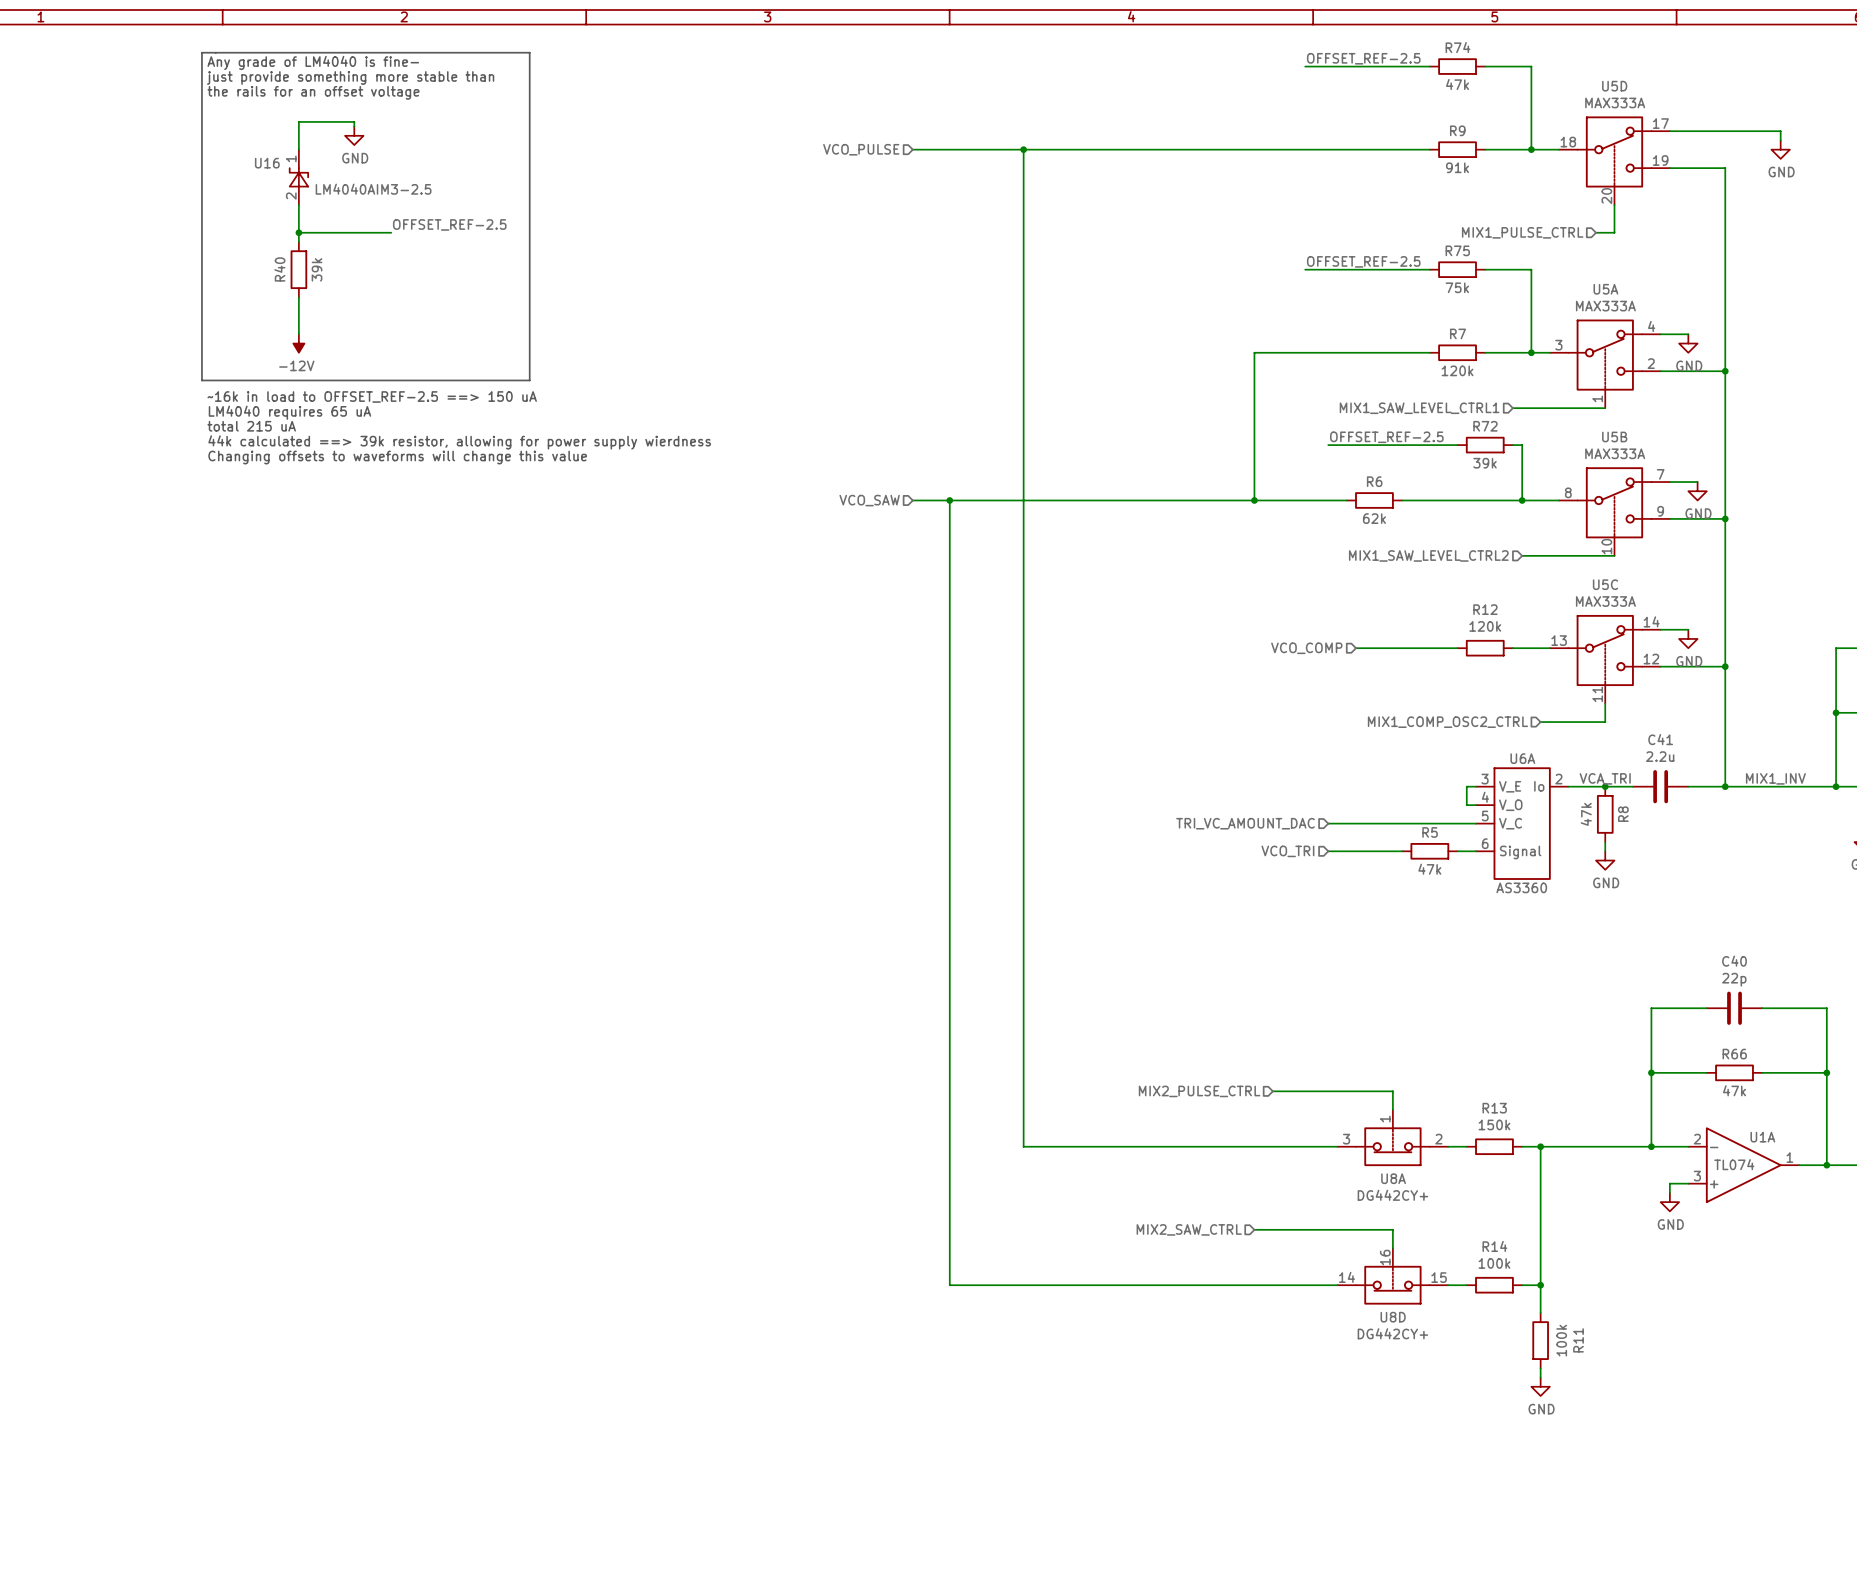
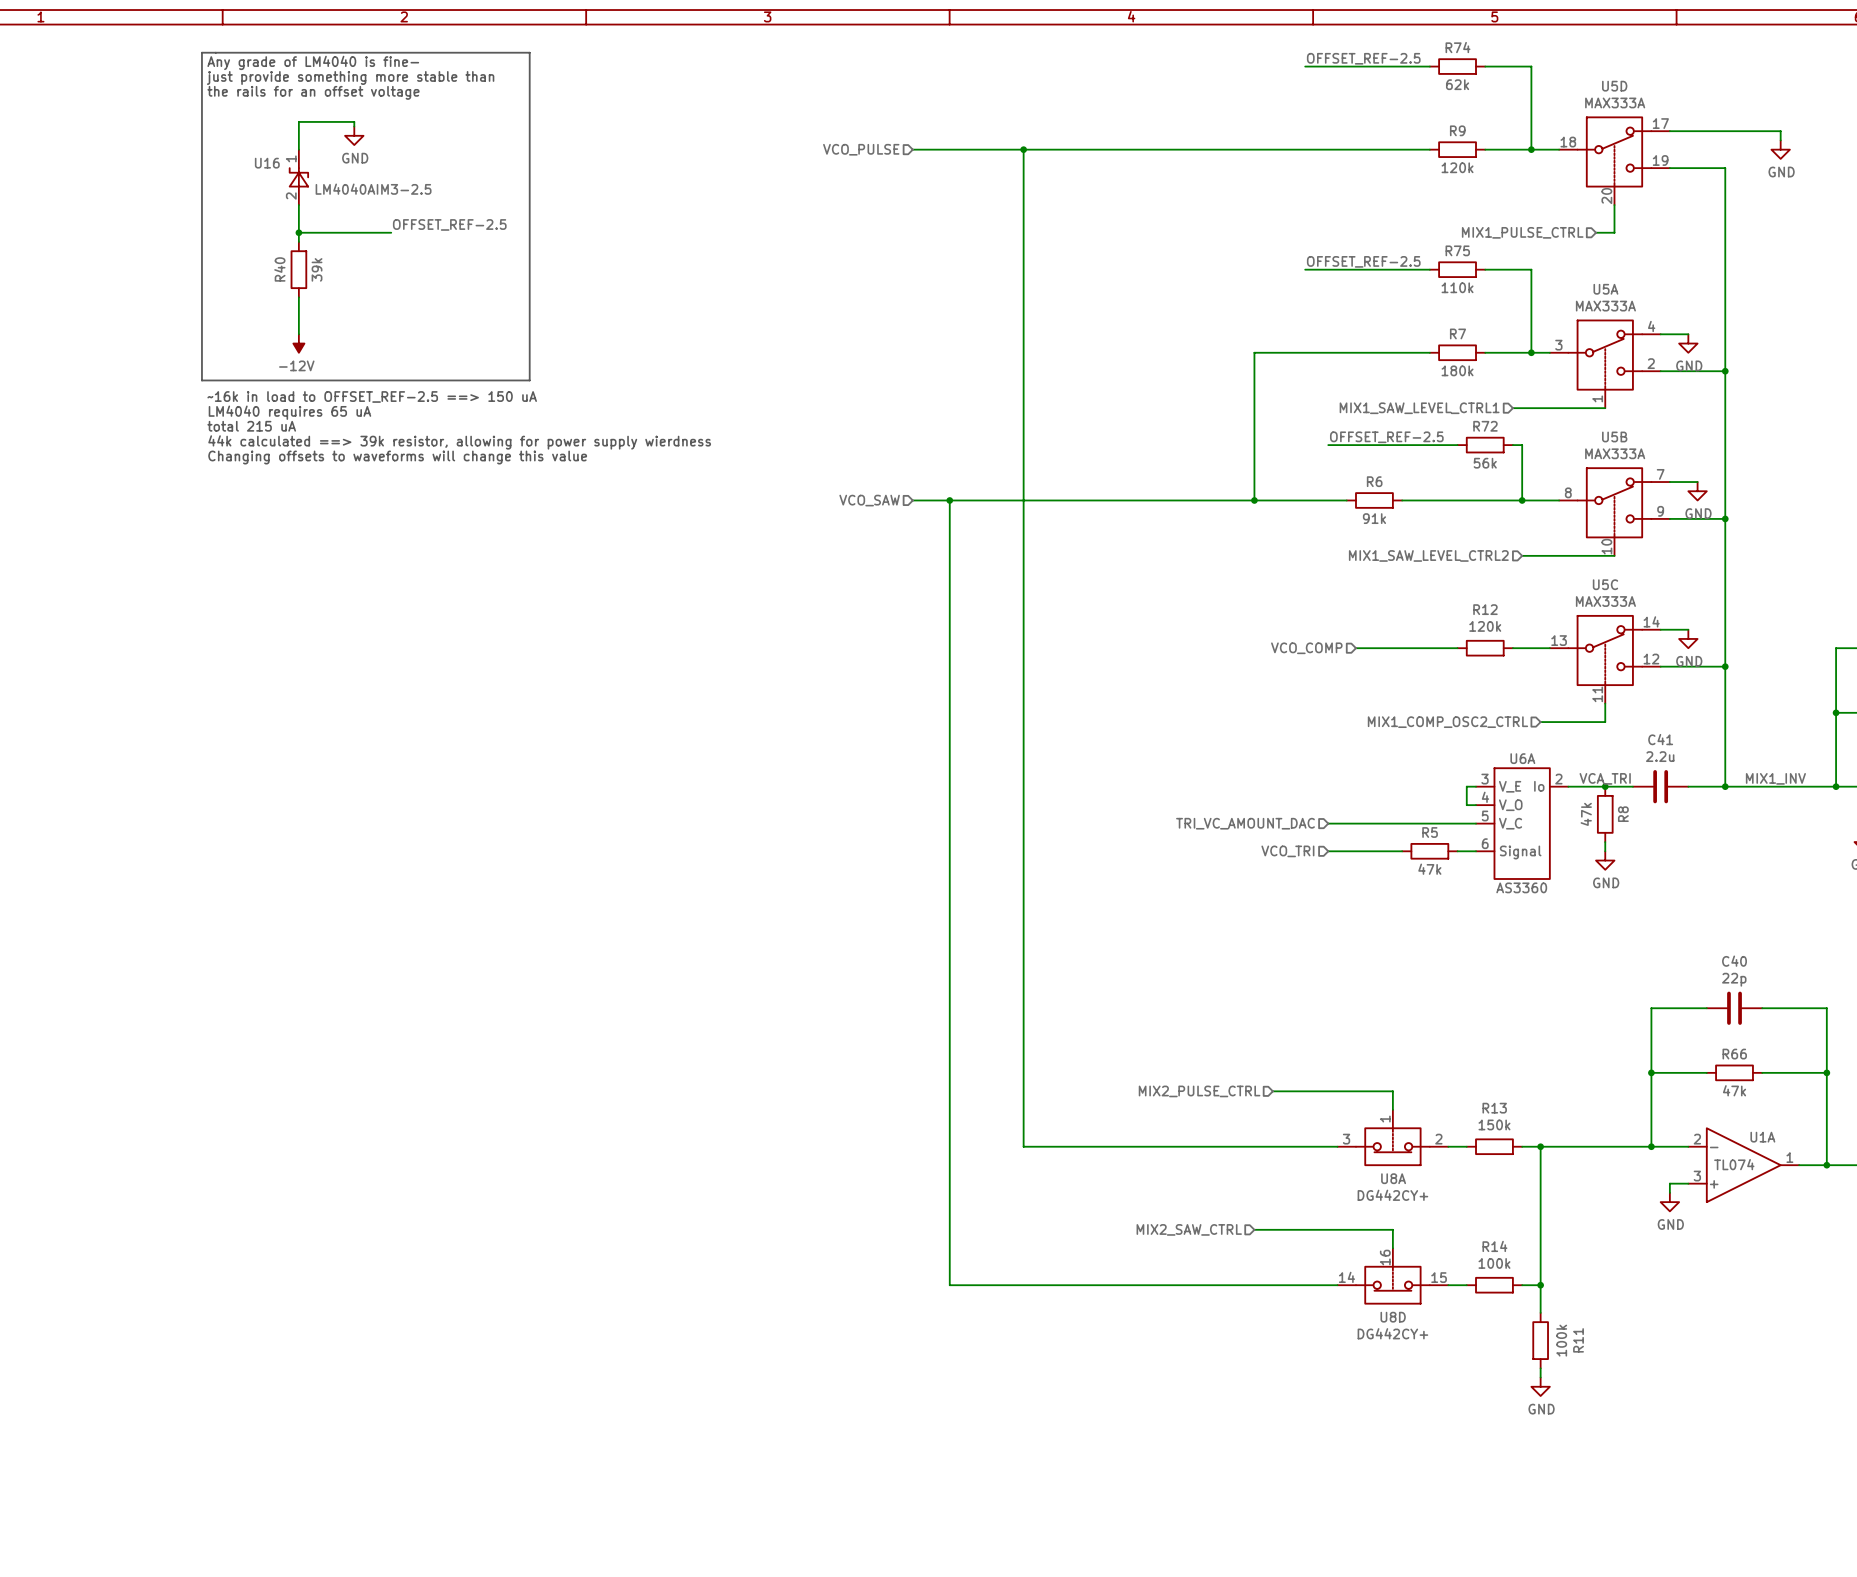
R74 value: 47k (1457, 84) -> 62k (1457, 84)
R9 value: 91k (1457, 167) -> 120k (1457, 167)
R75 value: 75k (1457, 287) -> 110k (1457, 287)
R7 value: 120k (1457, 370) -> 180k (1457, 370)
R72 value: 39k (1485, 463) -> 56k (1485, 463)
R6 value: 62k (1374, 518) -> 91k (1374, 518)

